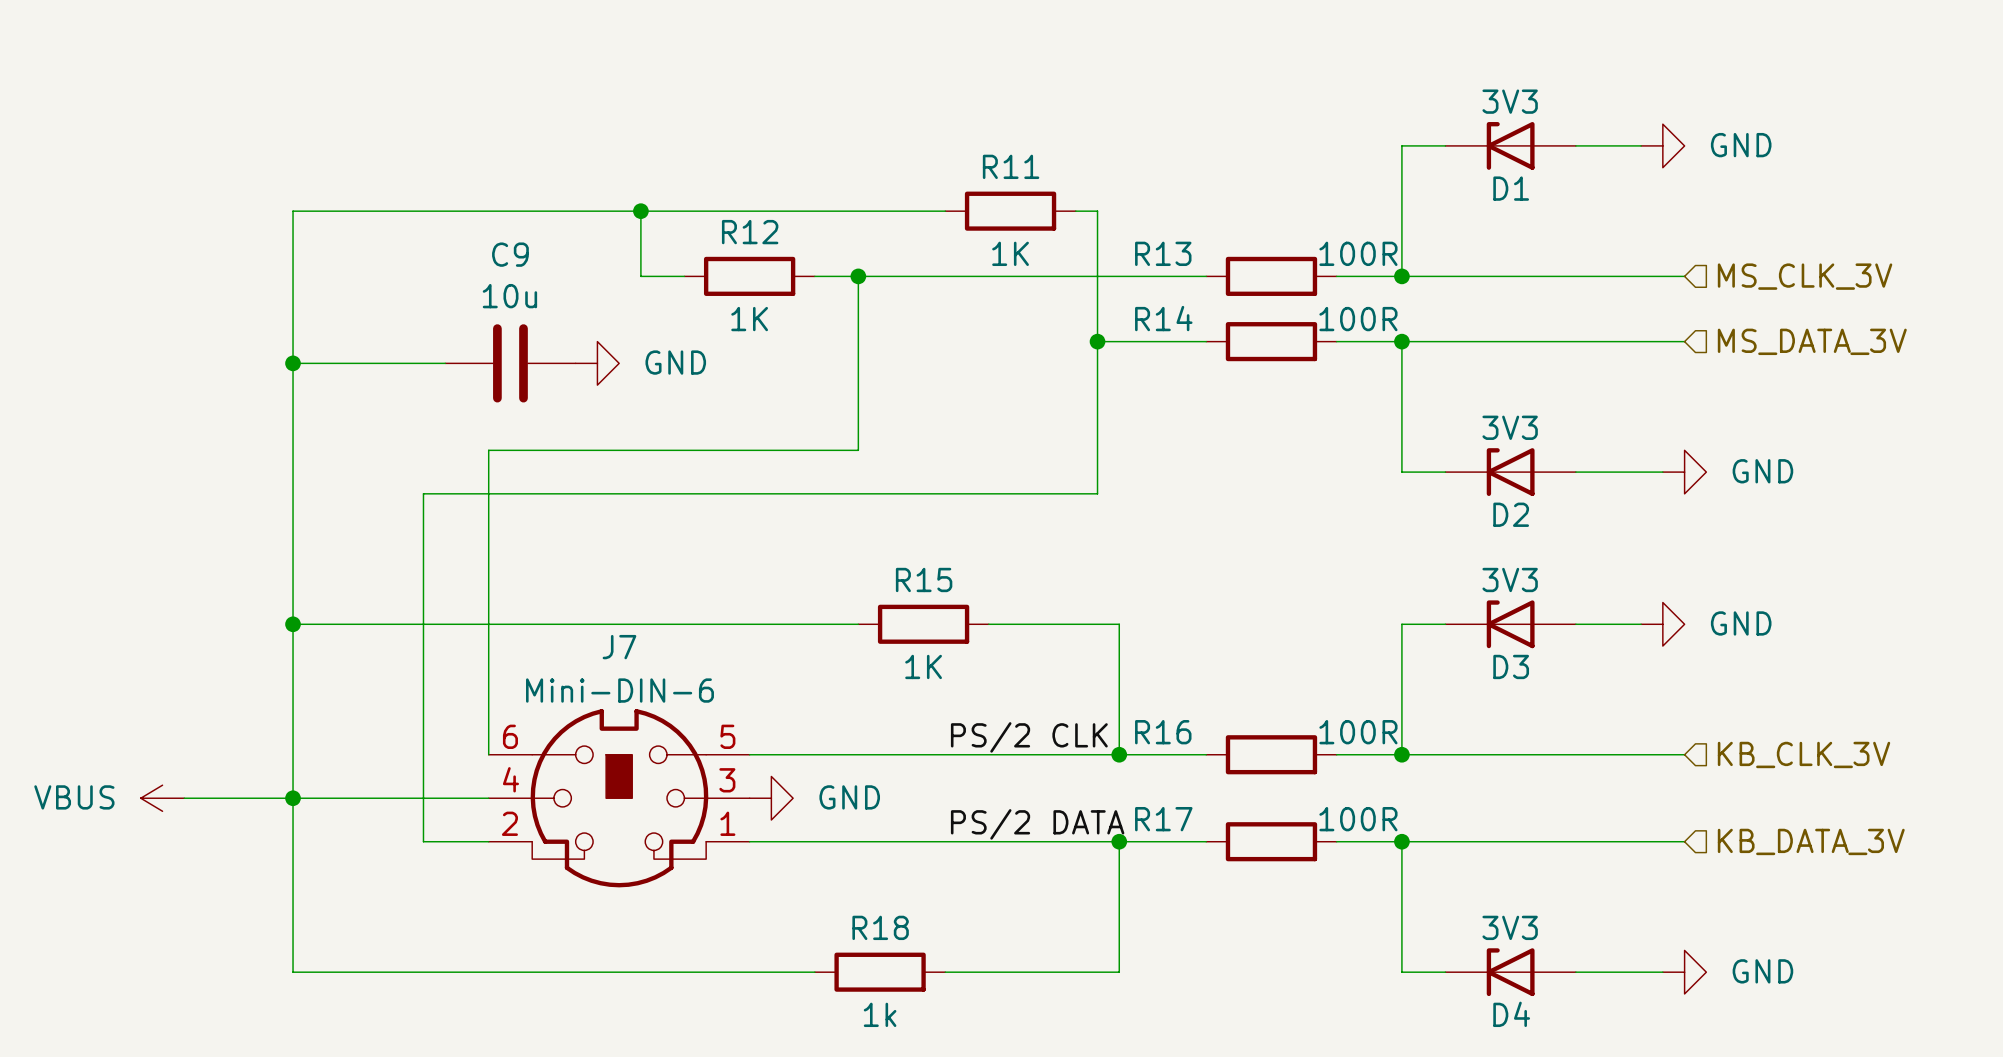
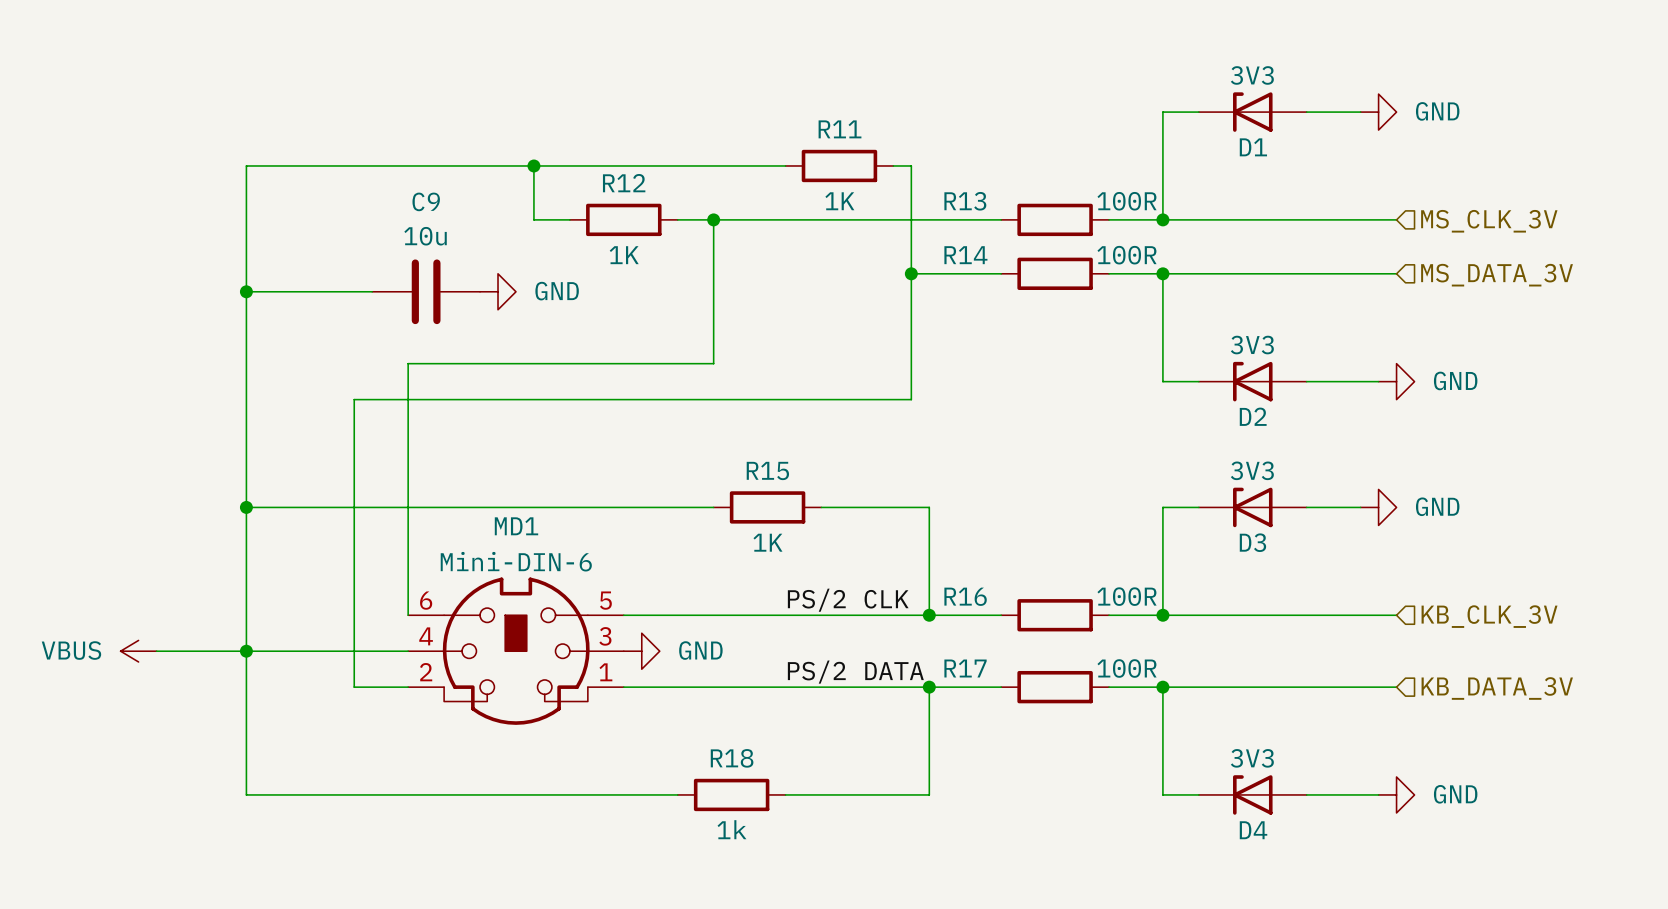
J7 name: J7 (619, 647) -> MD1 (516, 526)

